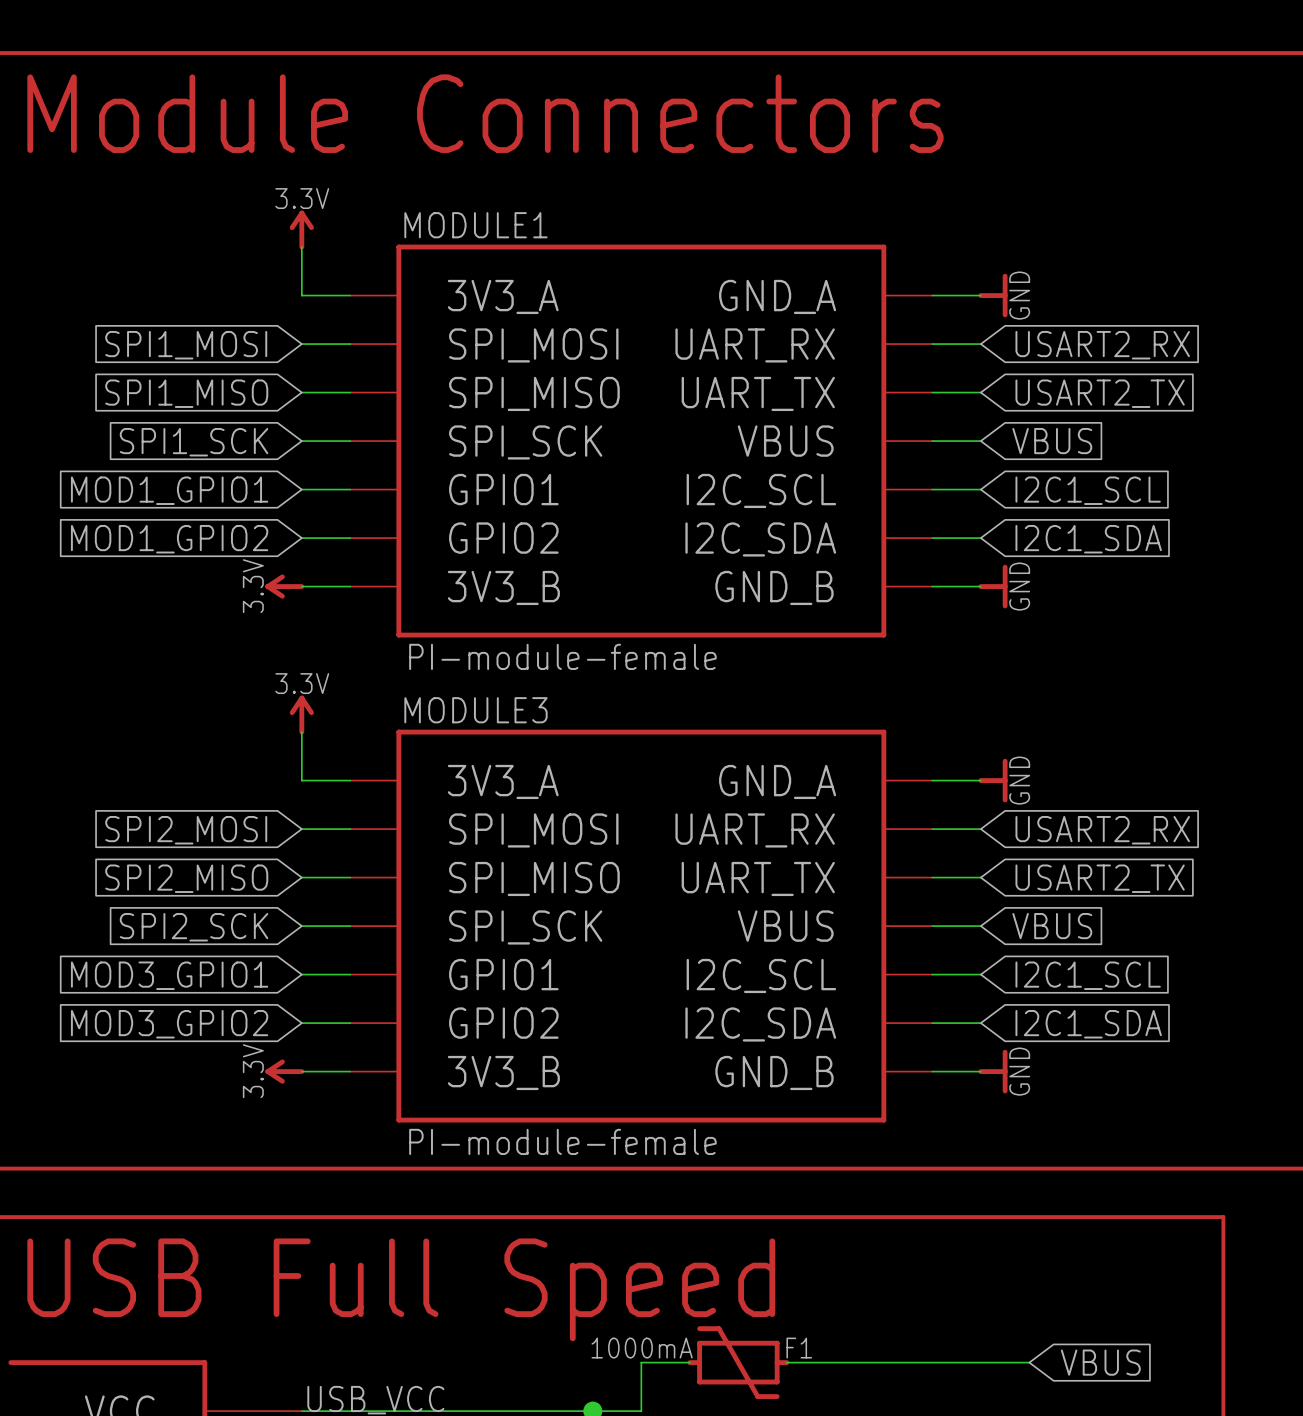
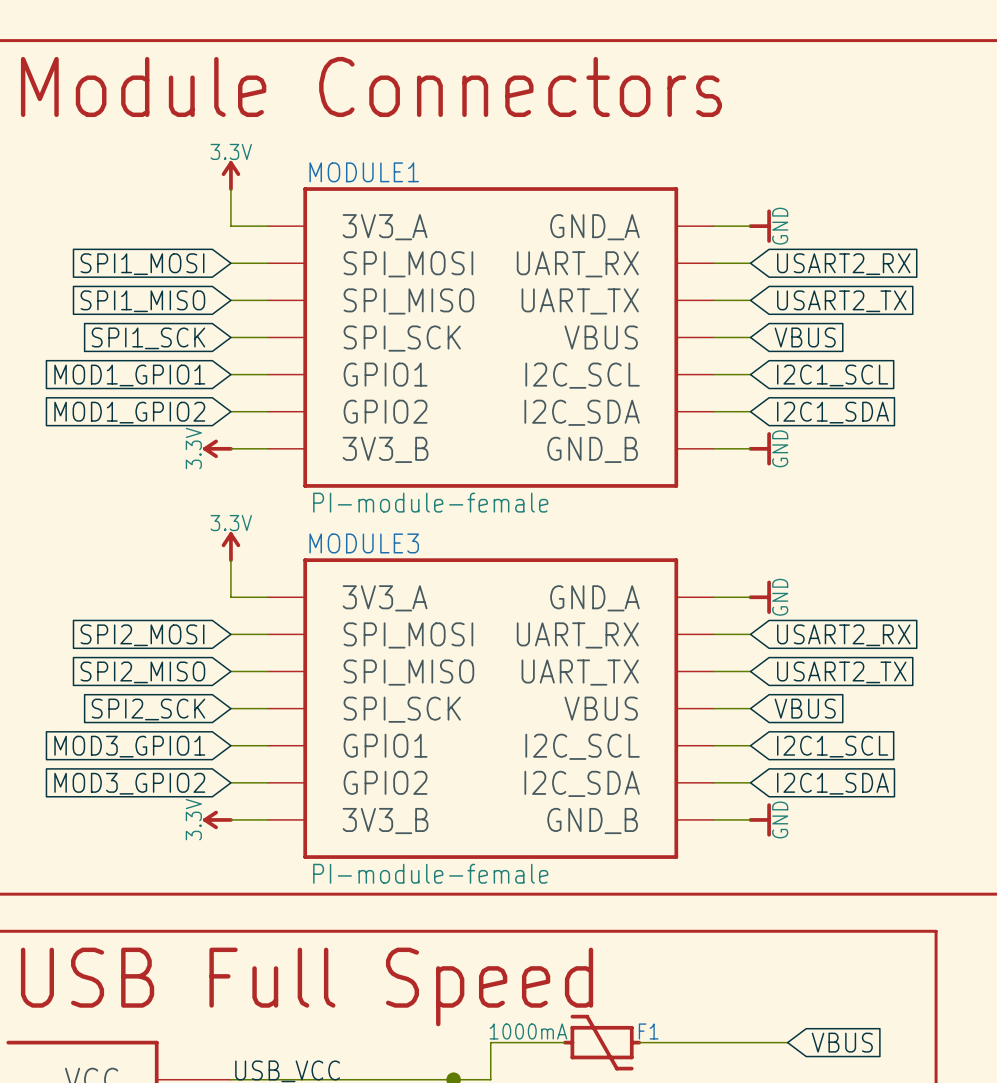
F1 position: (738, 1362) -> (602, 1042)
wire: (786, 1362) (835, 1362) -> (527, 1042) (564, 1042)

